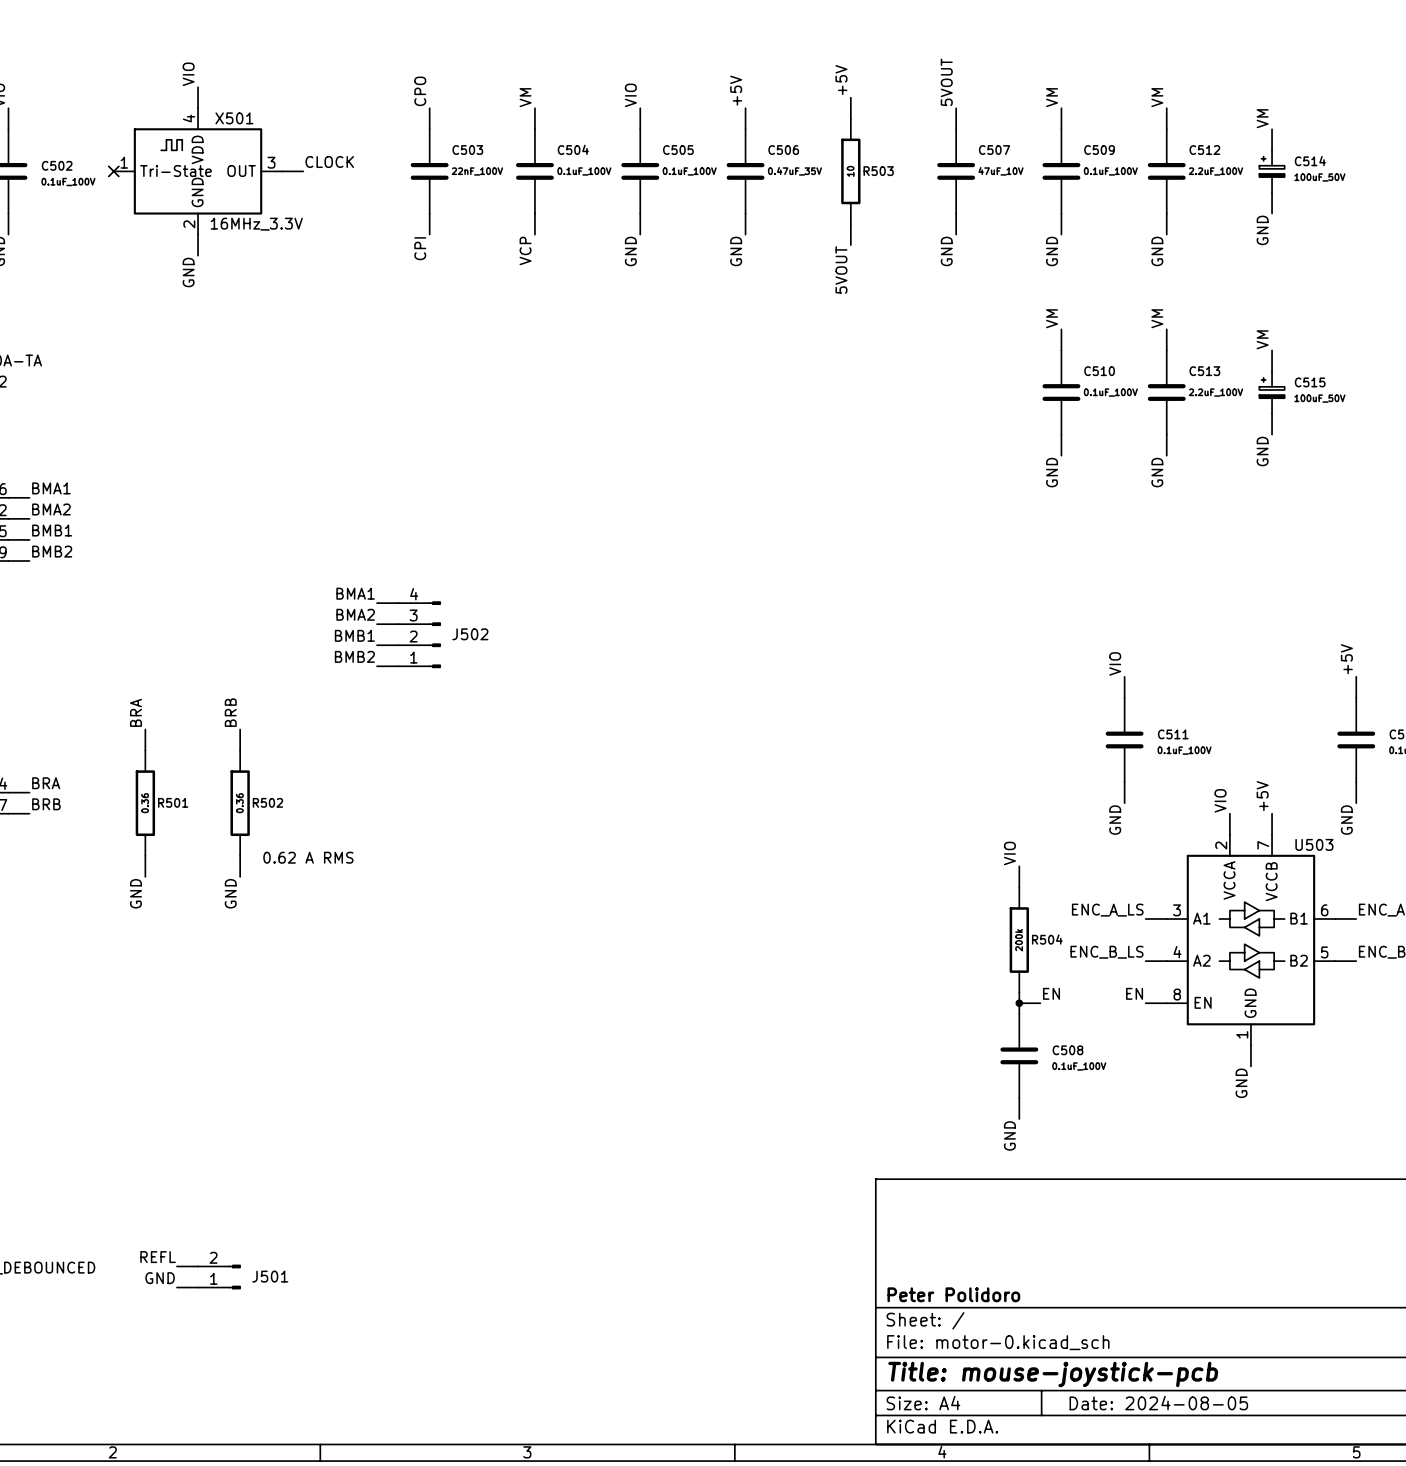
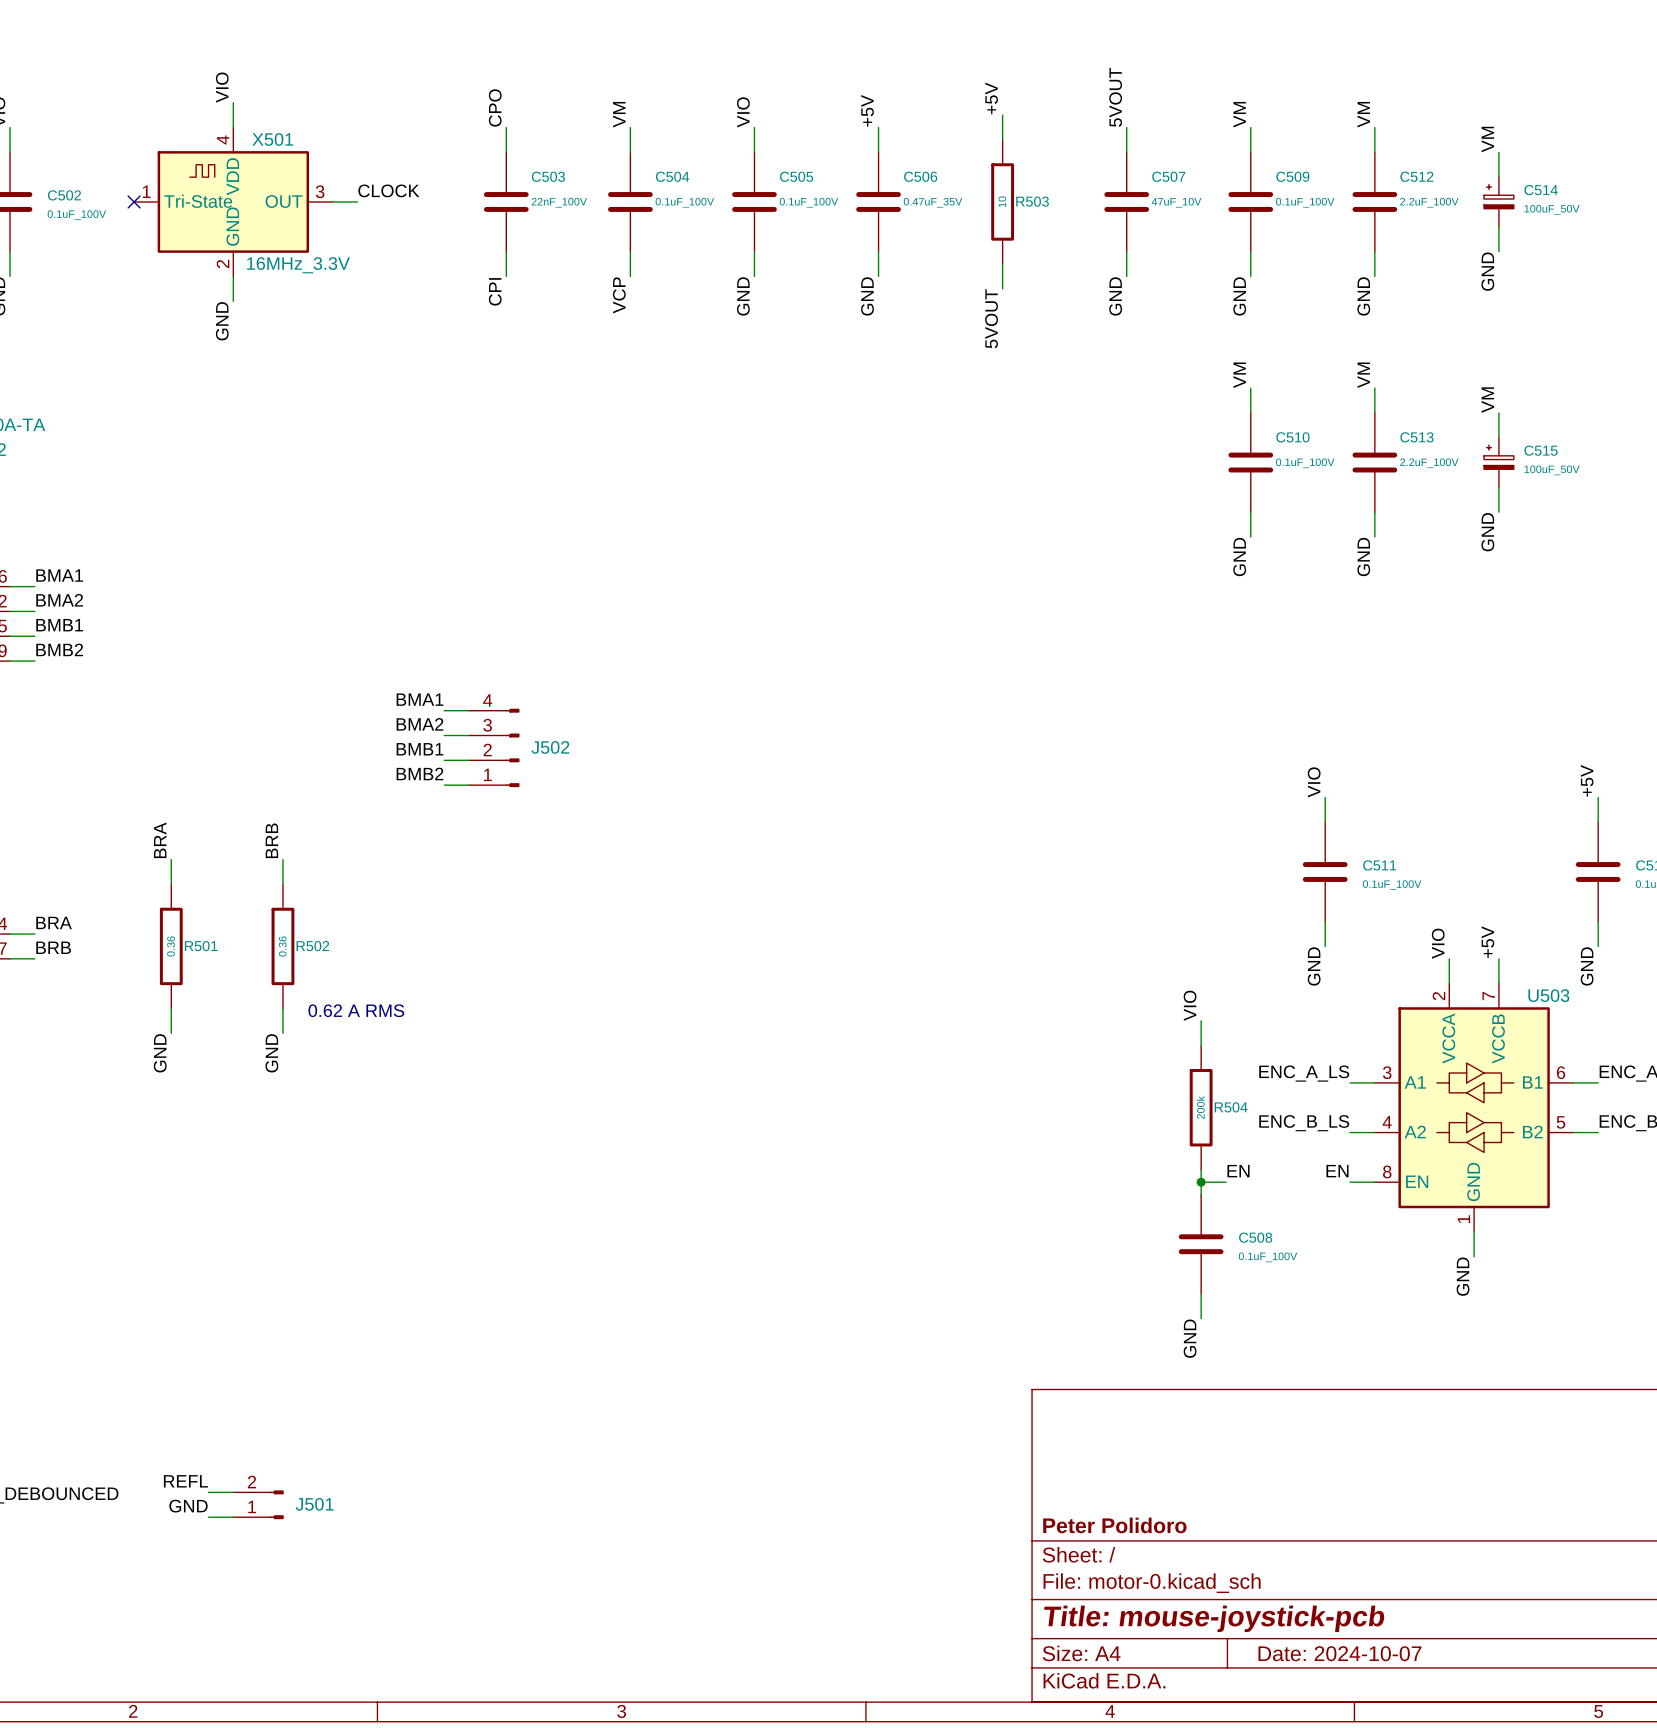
title block: Date: 2024-08-05 (1158, 1403) -> Date: 2024-10-07 (1339, 1653)

